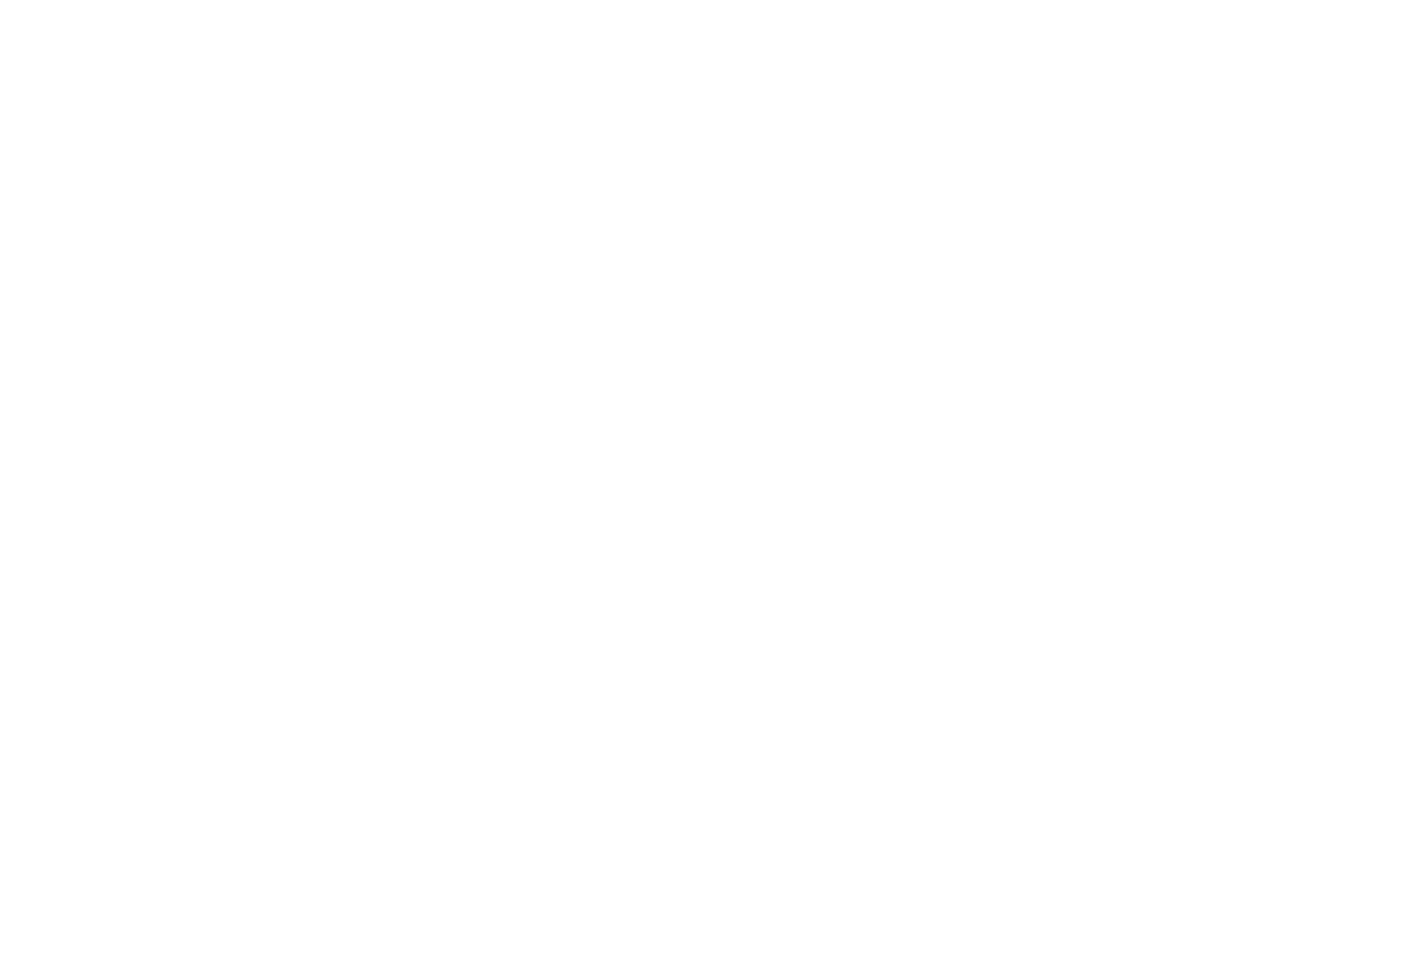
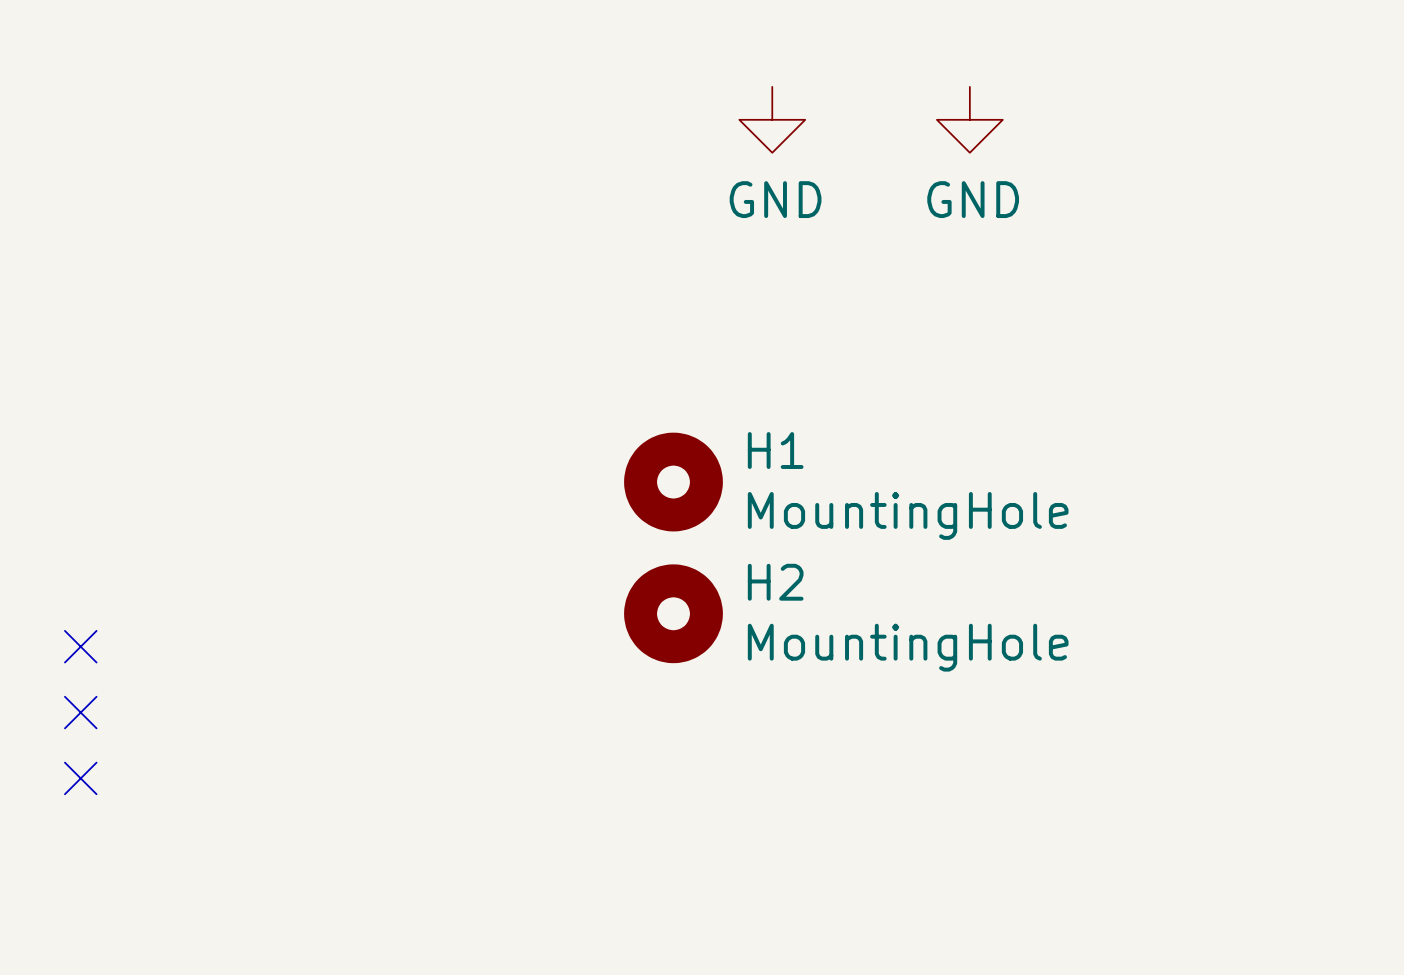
power symbol: none -> GND (772, 119)
power symbol: none -> GND (969, 119)
H1: none -> MountingHole (673, 482)
H2: none -> MountingHole (673, 613)
no-connect mark: none -> (80, 646)
no-connect mark: none -> (80, 712)
no-connect mark: none -> (80, 778)

